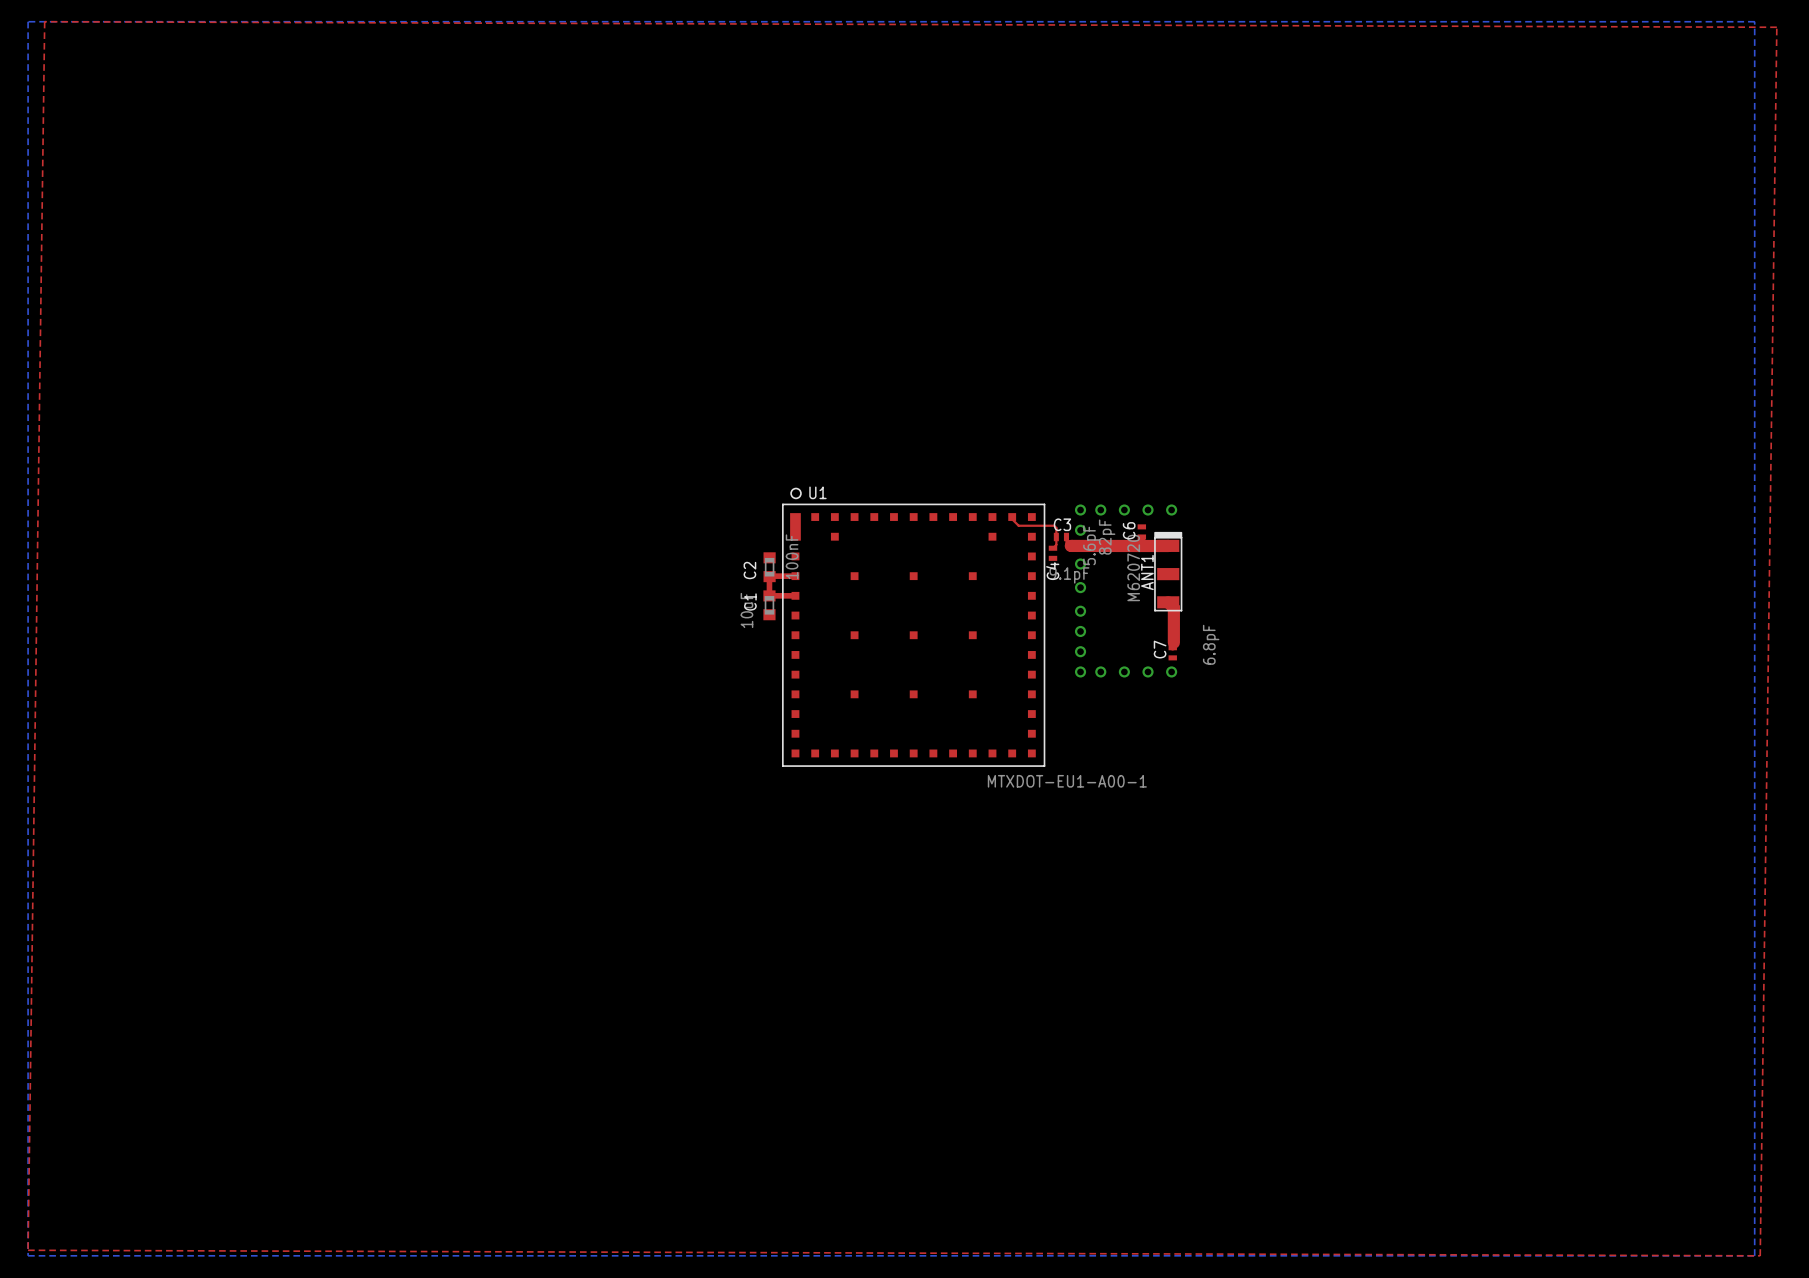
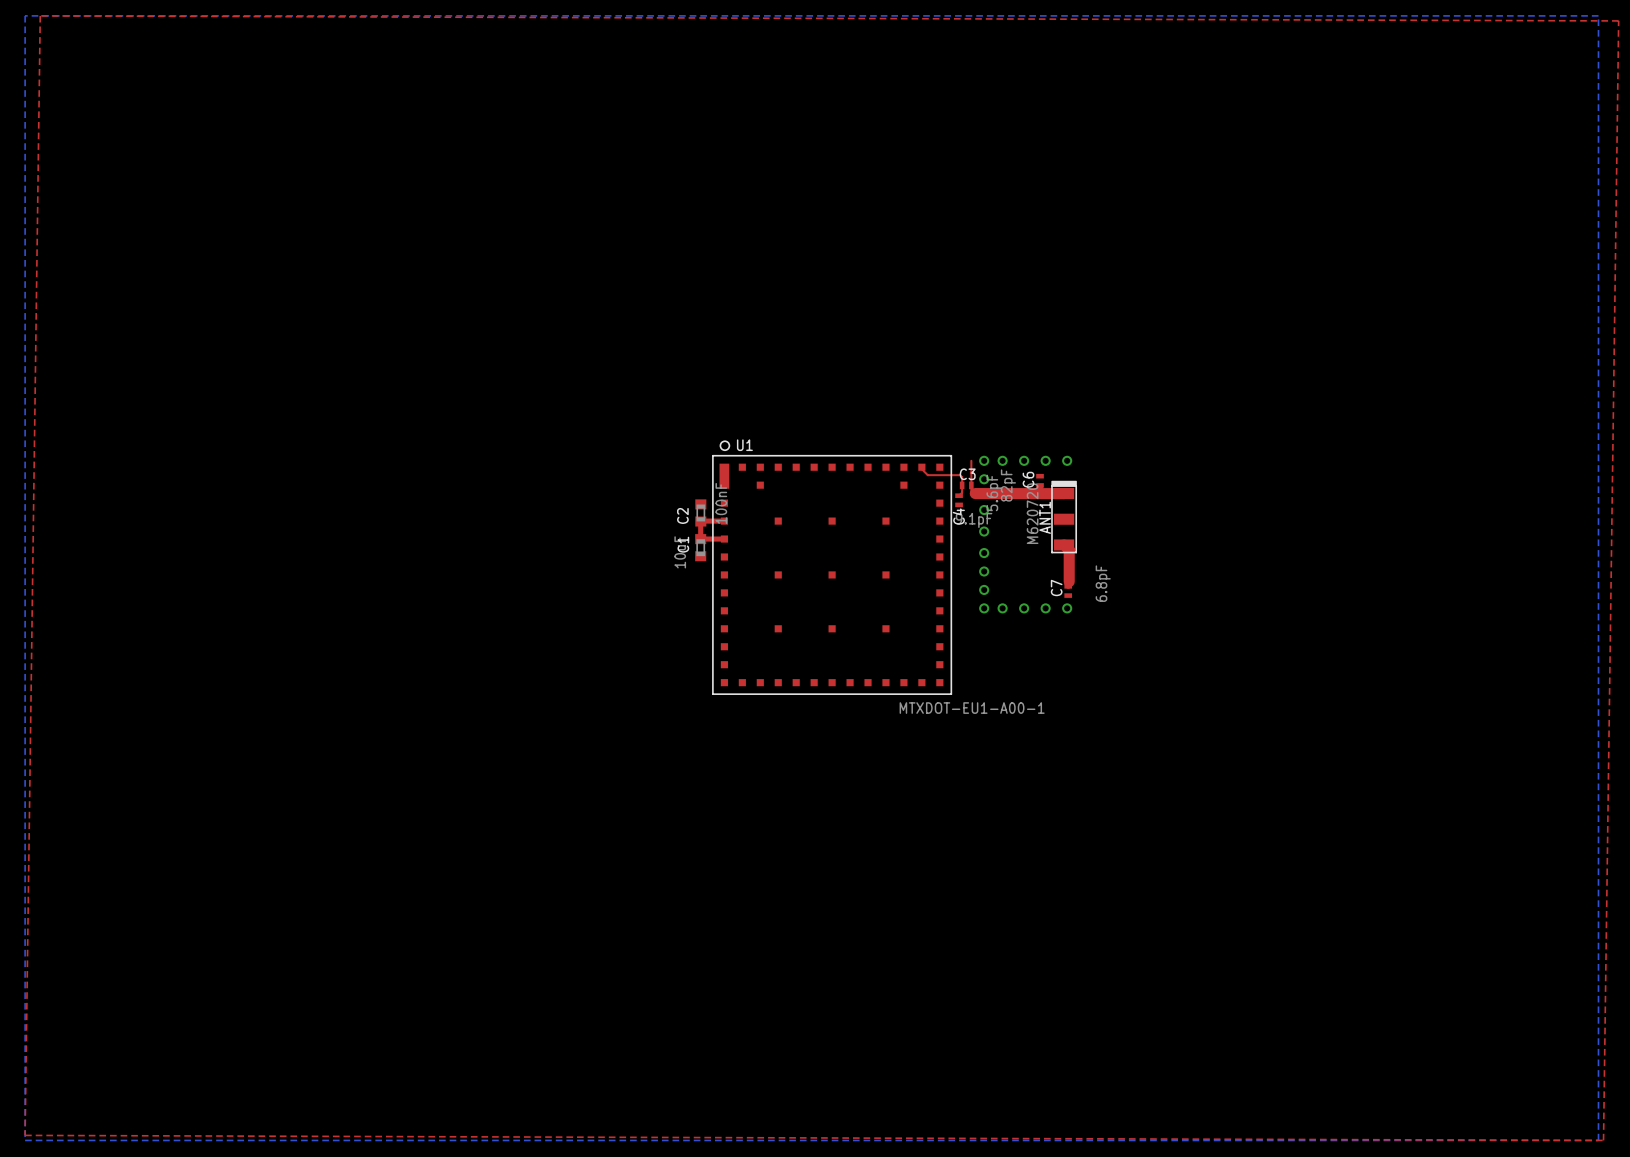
top track: none -> (971, 460) (971, 485)

